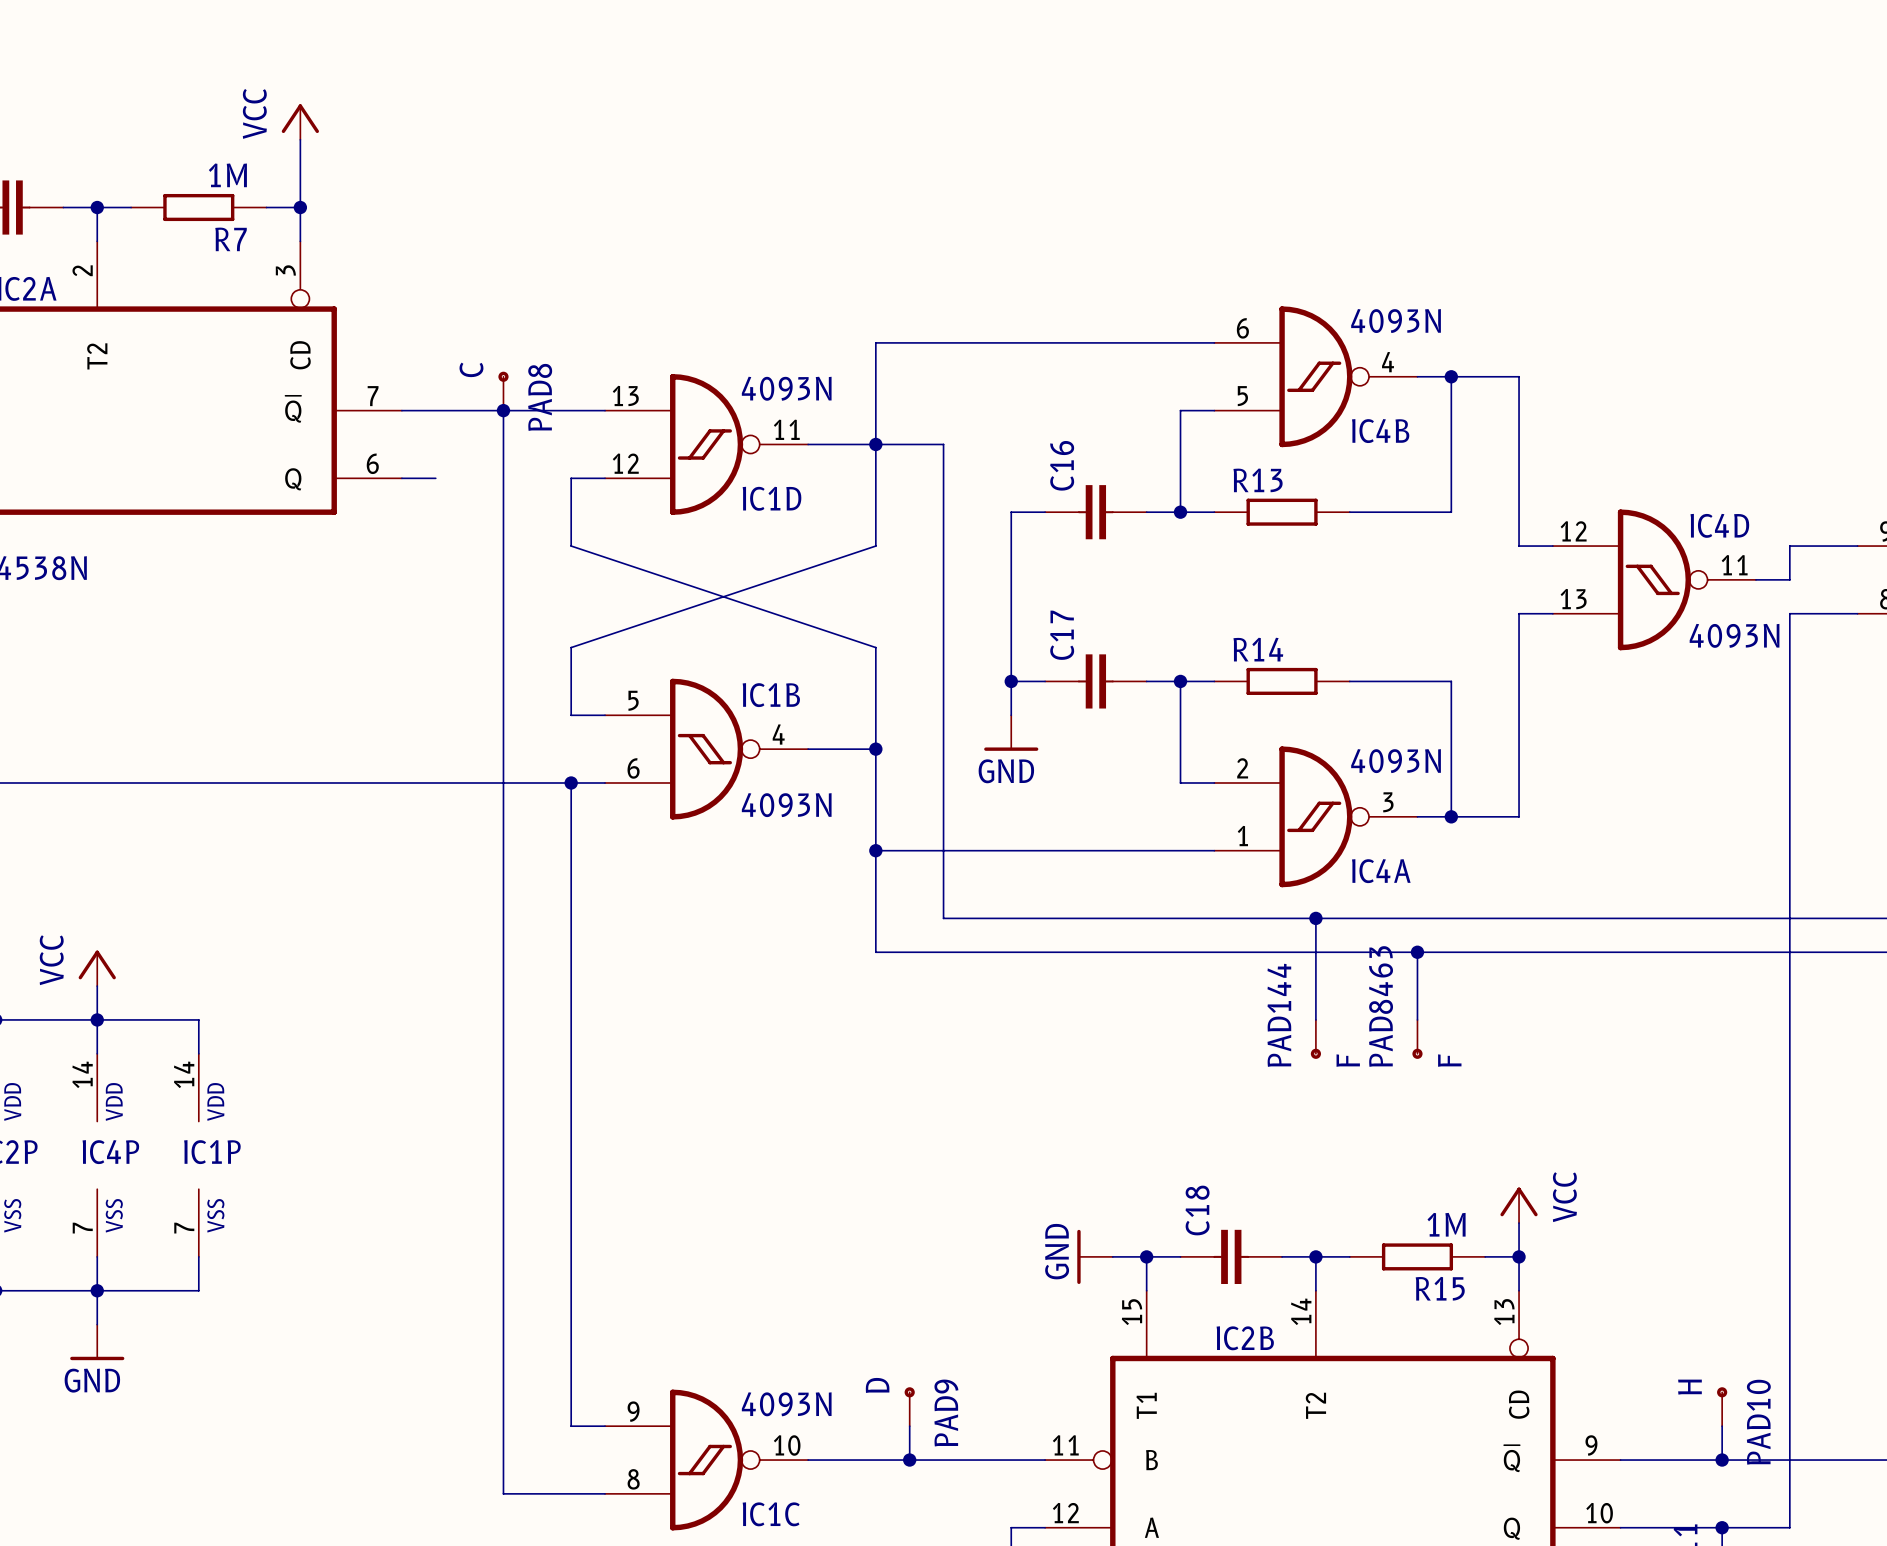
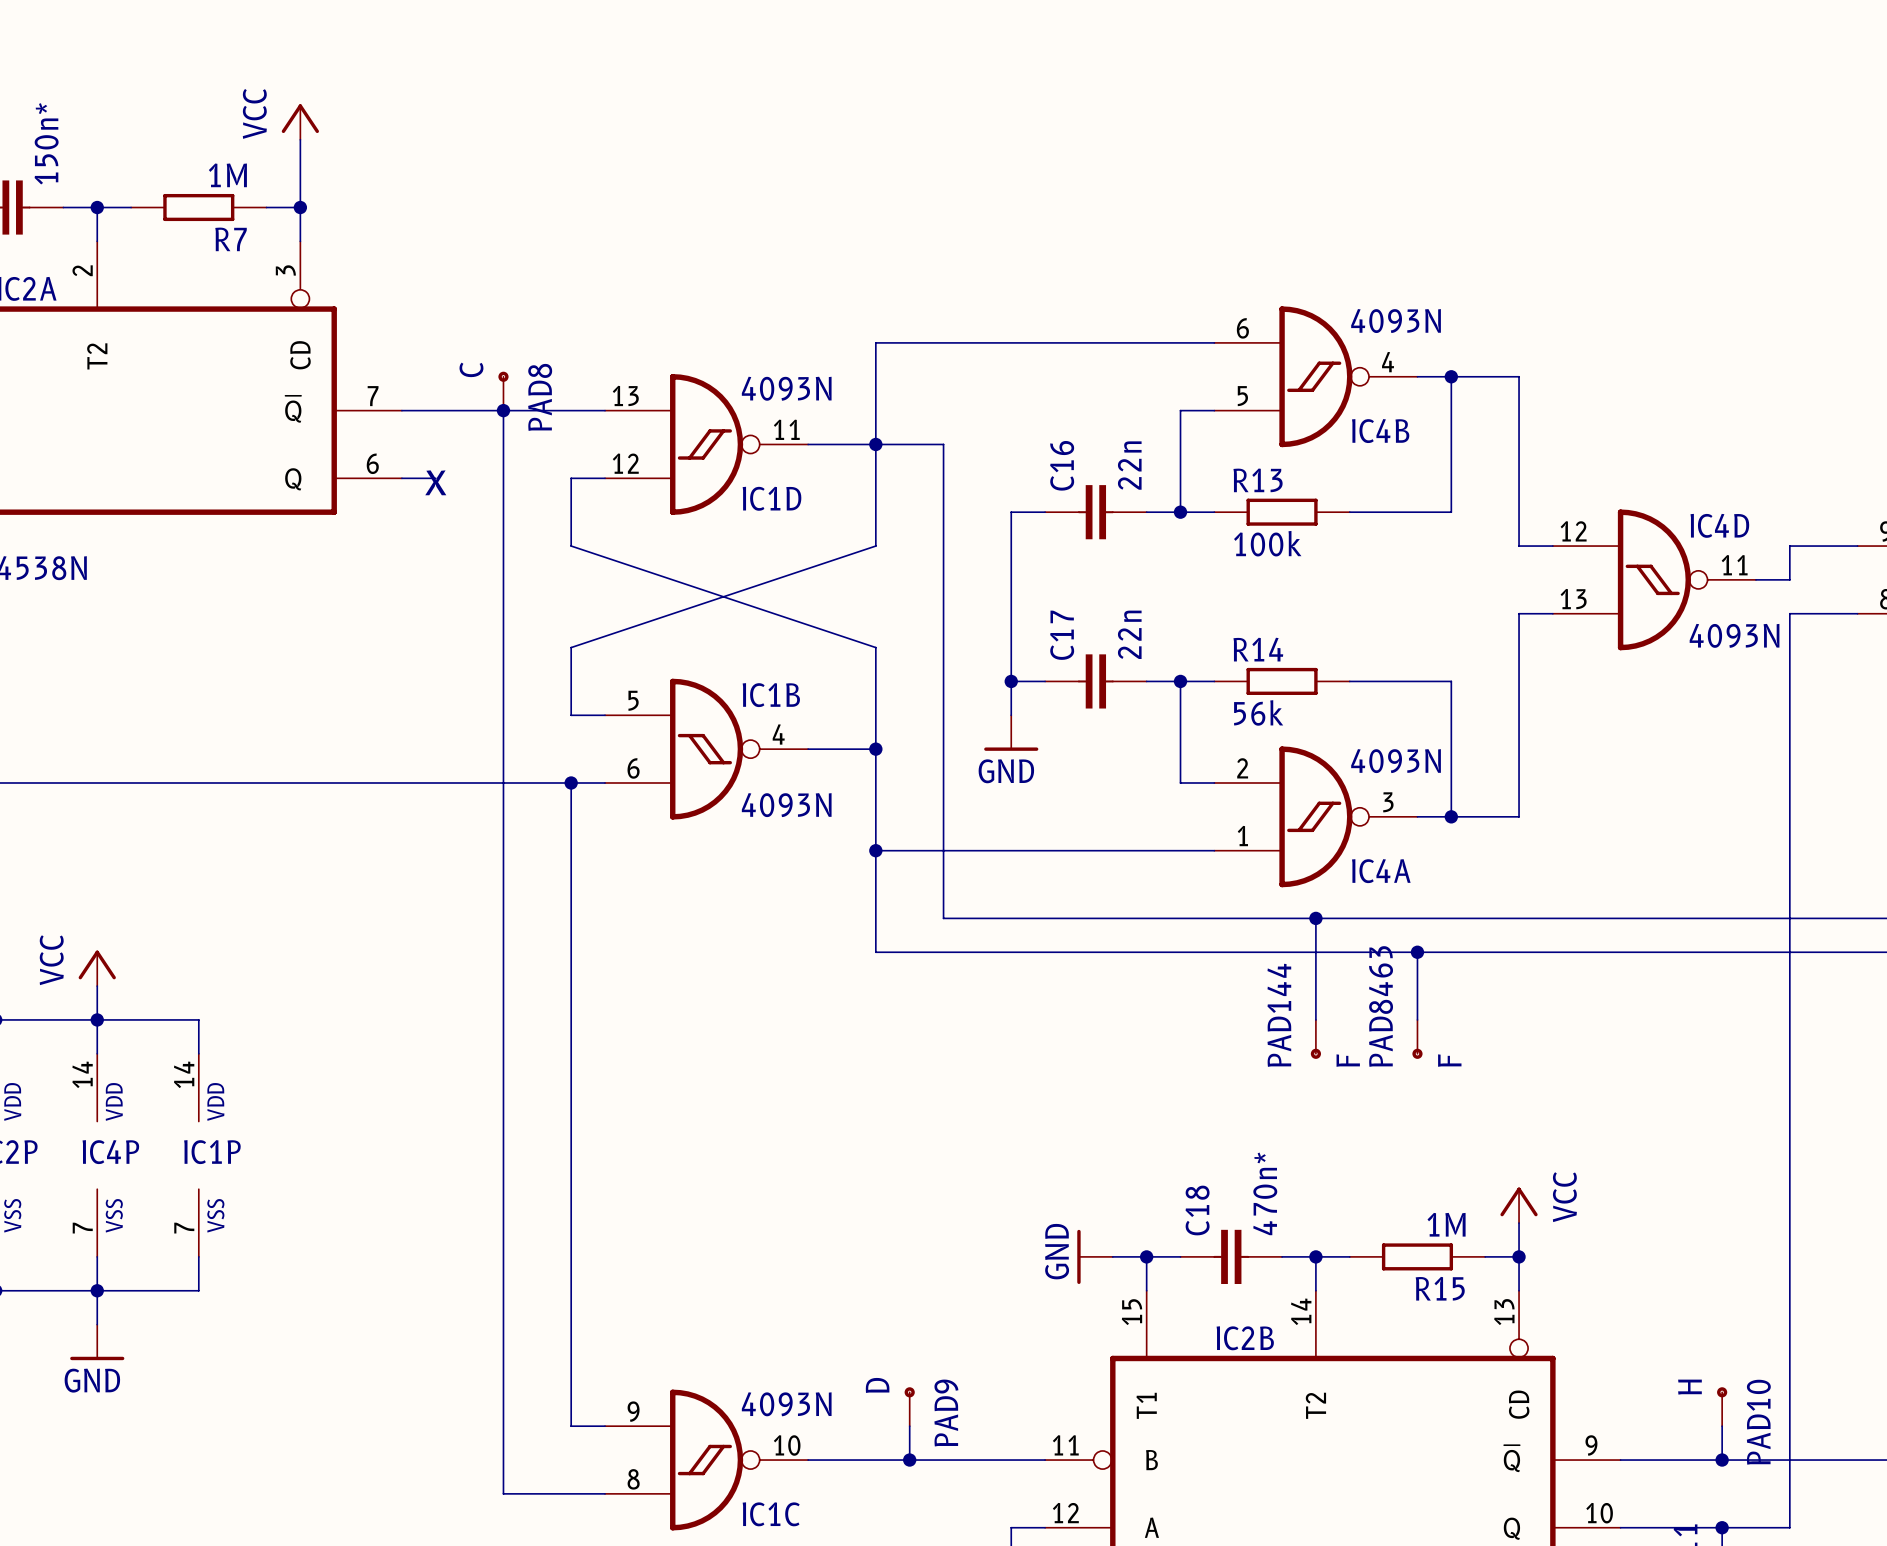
part value: none -> 150n* (46, 143)
C16 value: none -> 22n (1129, 465)
text: none -> x (435, 482)
R13 value: none -> 100k (1267, 543)
C17 value: none -> 22n (1129, 634)
R14 value: none -> 56k (1258, 712)
C18 value: none -> 470n* (1265, 1193)

